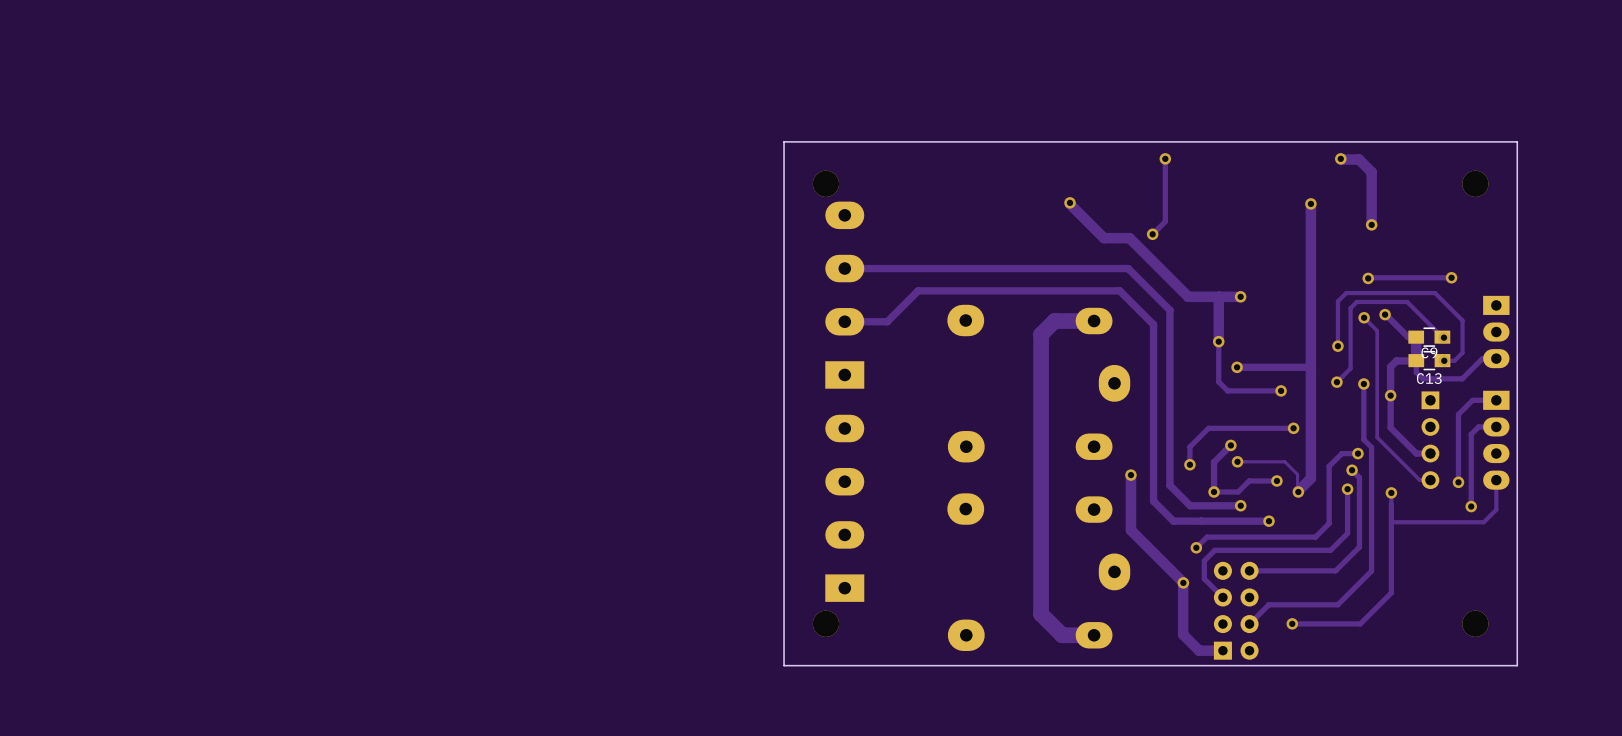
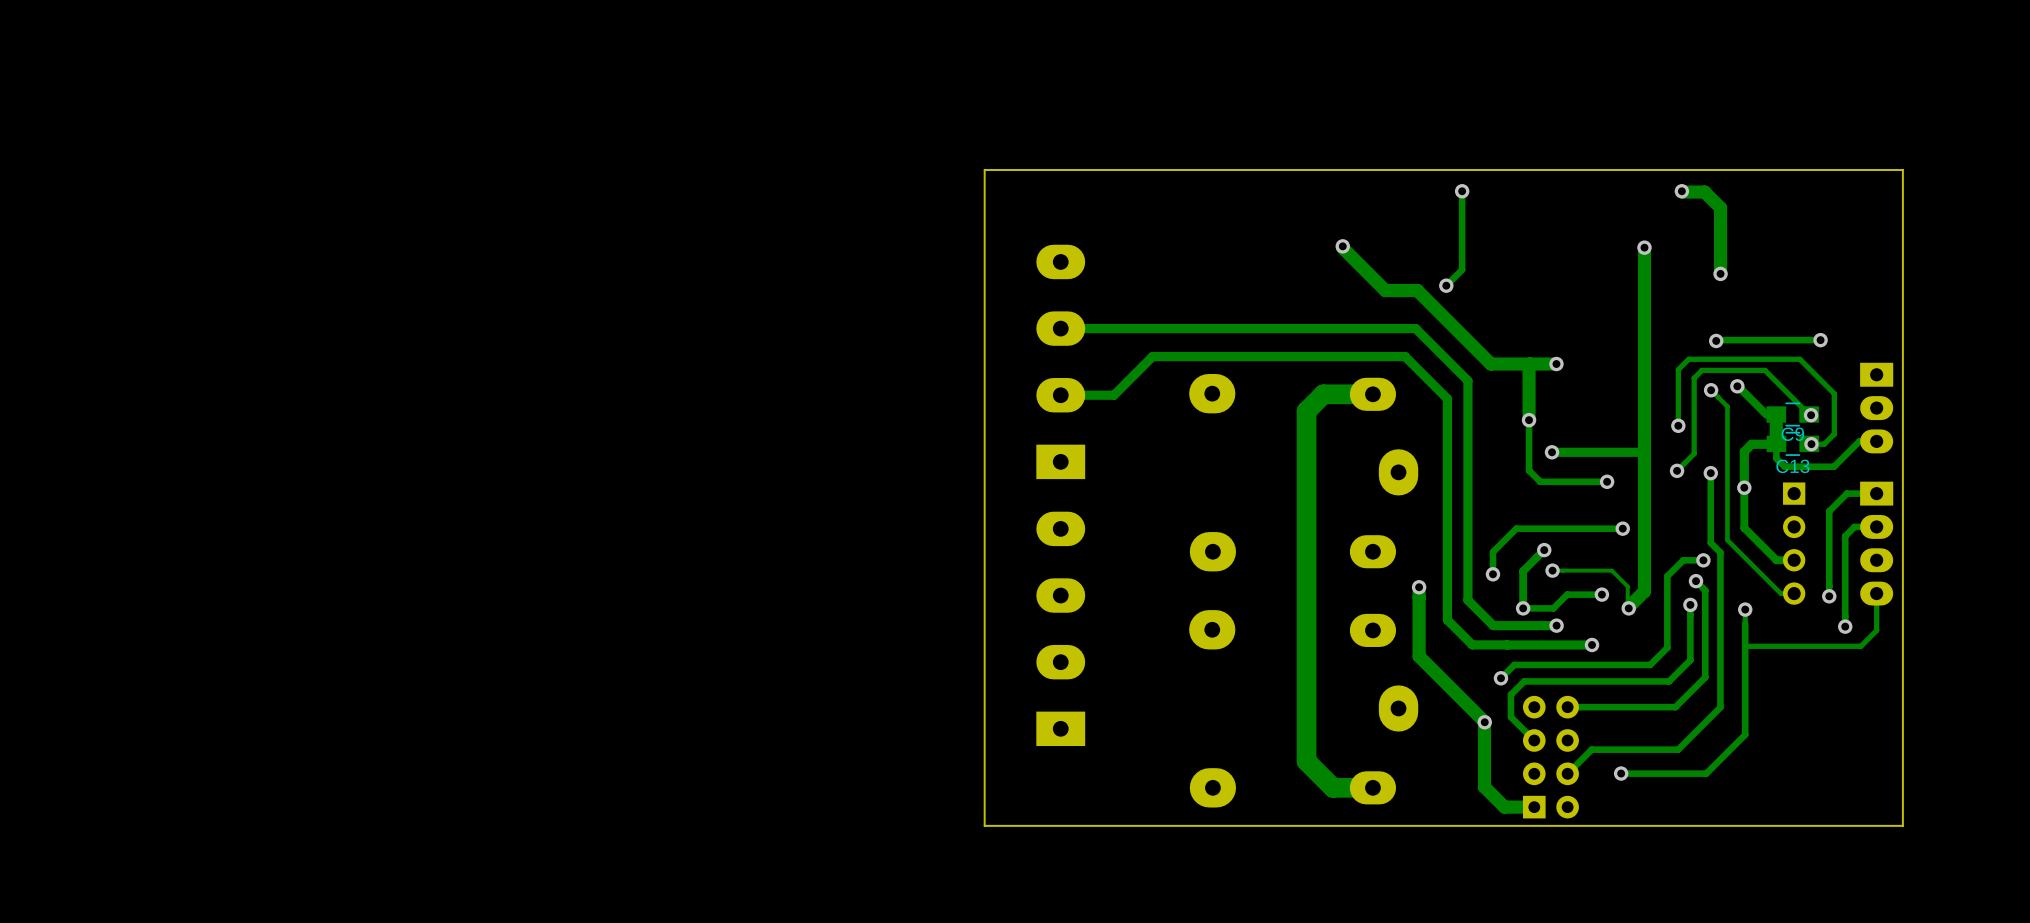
part: (825, 183) -> none
part: (1475, 183) -> none
part: (825, 623) -> none
part: (1475, 623) -> none

